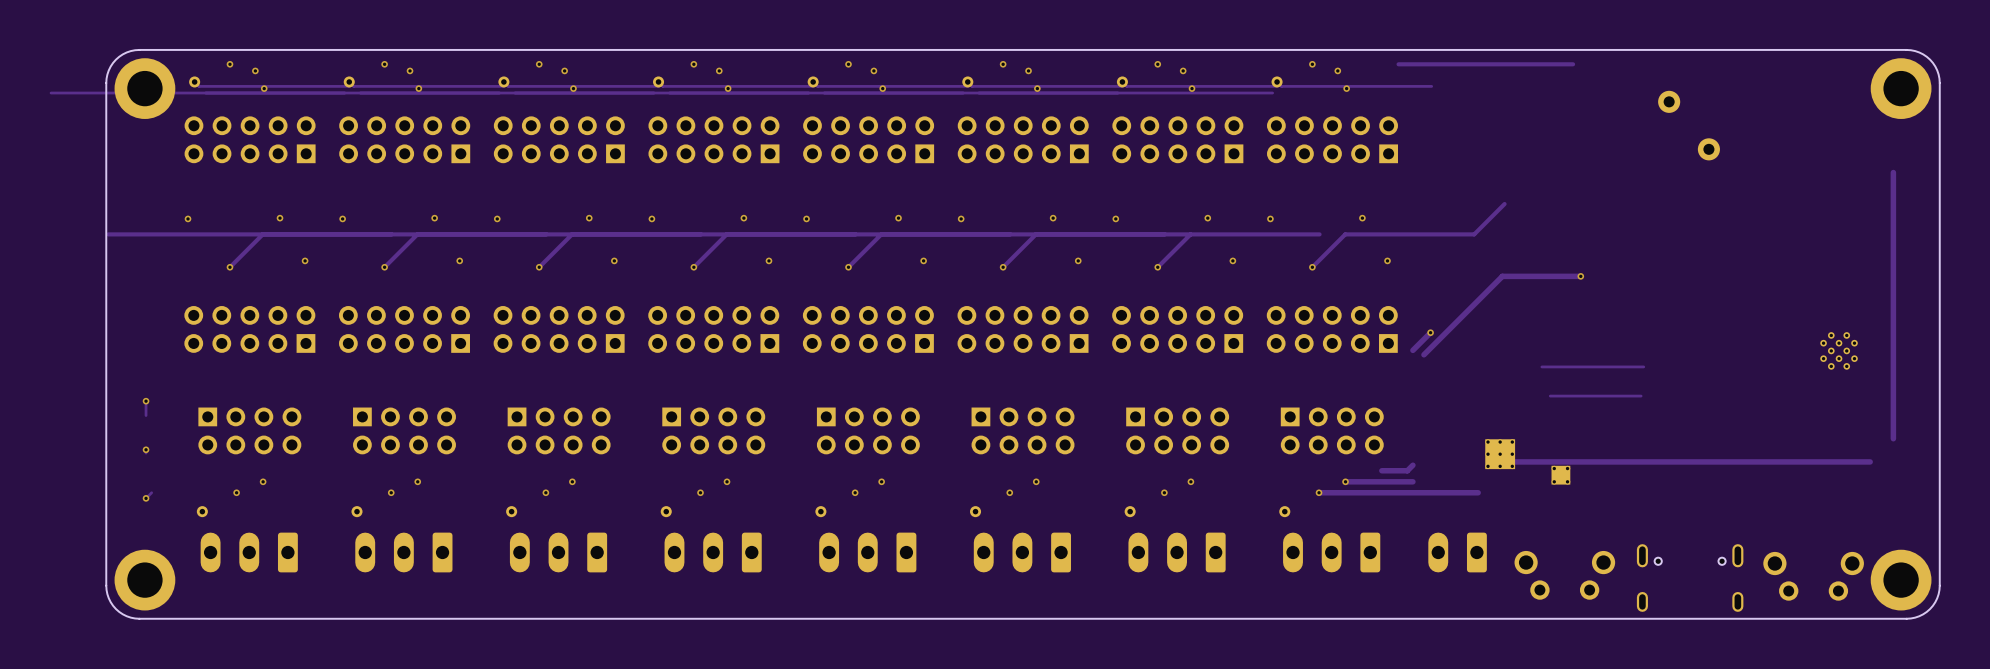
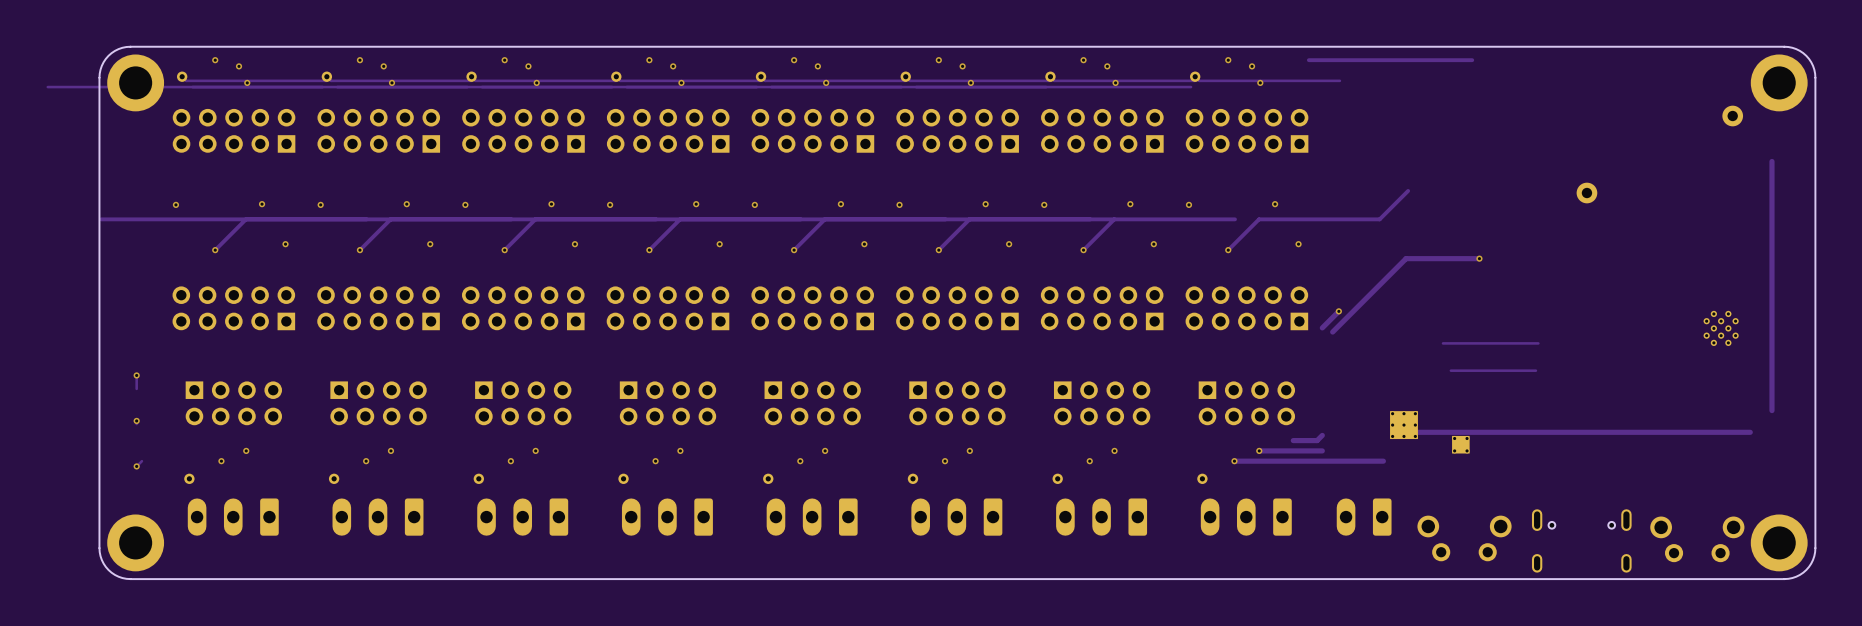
part: (1669, 101) -> none
part: none -> (1732, 116)
part: (1708, 149) -> none
part: none -> (1586, 193)

